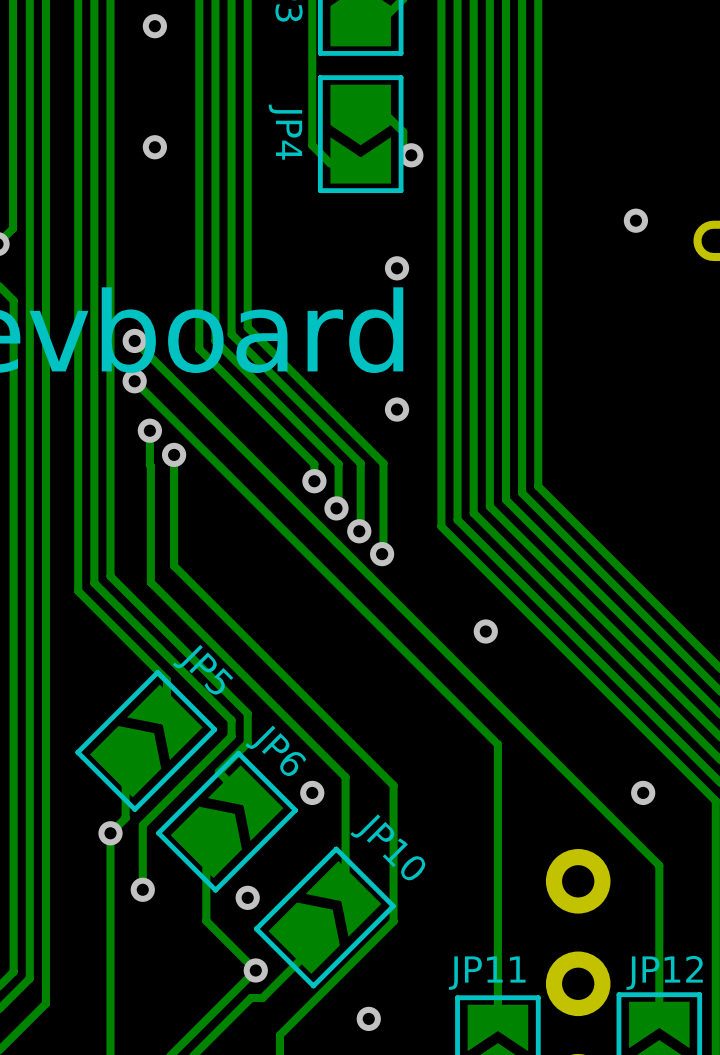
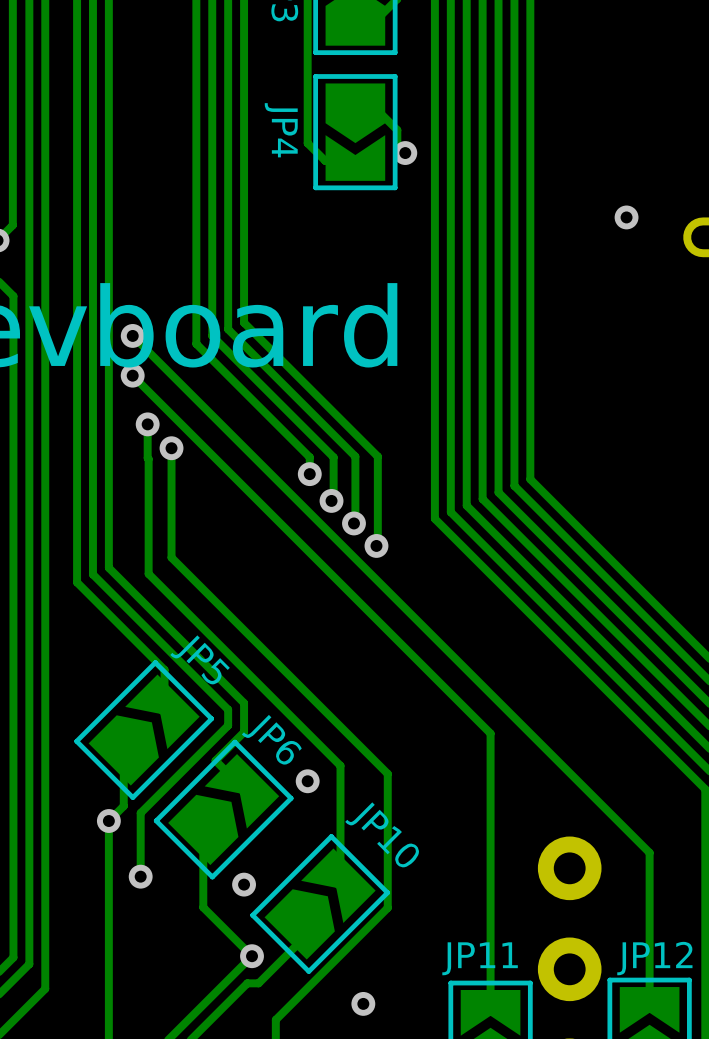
via: (154, 26) -> none
via: (154, 147) -> none
via: (397, 268) -> none
via: (397, 409) -> none
via: (485, 631) -> none
via: (643, 792) -> none

